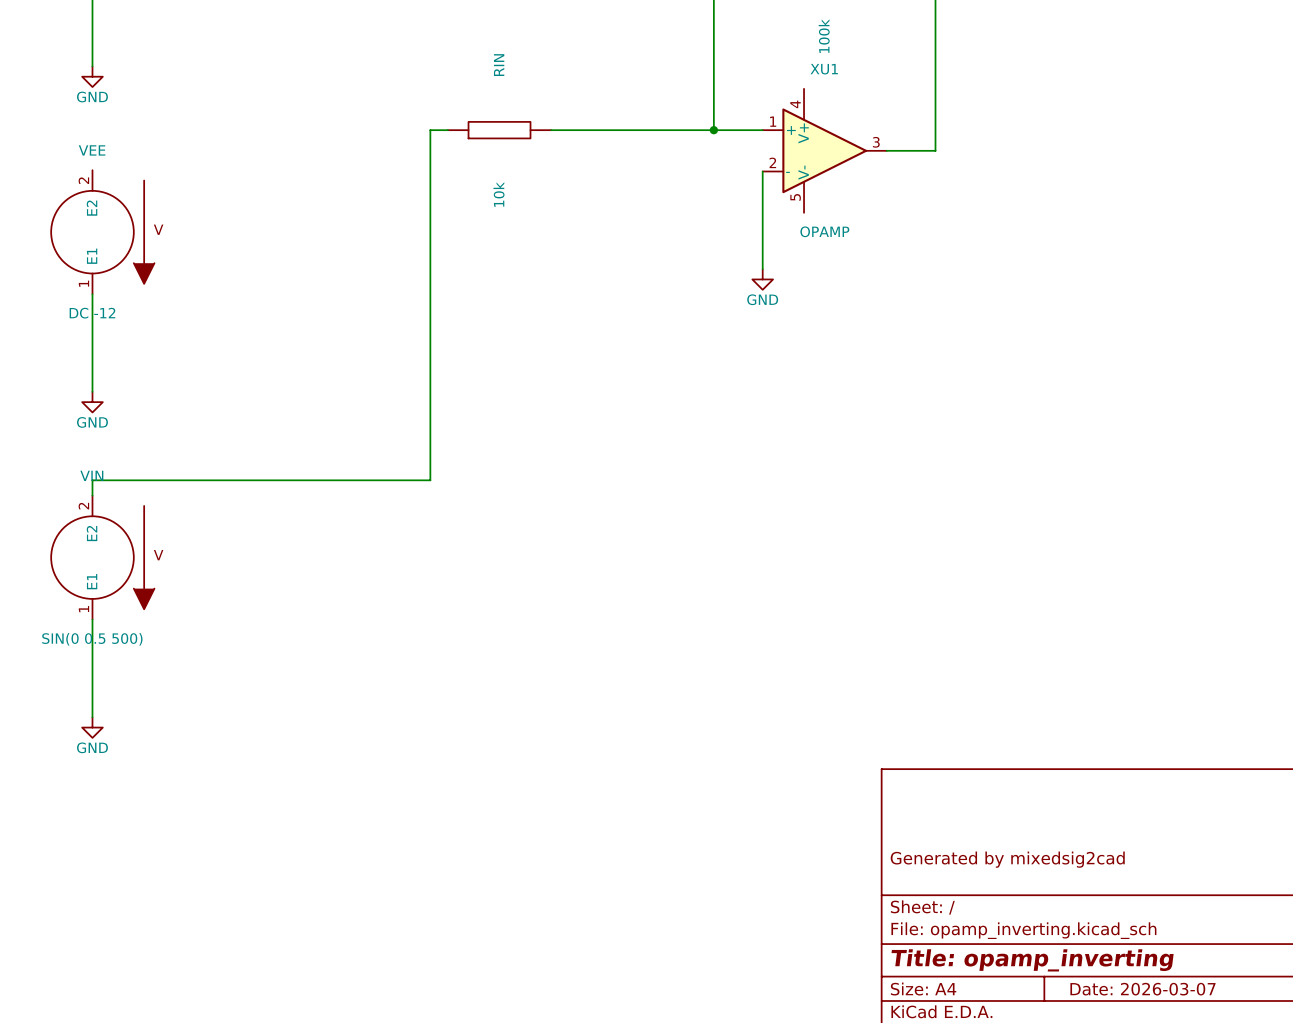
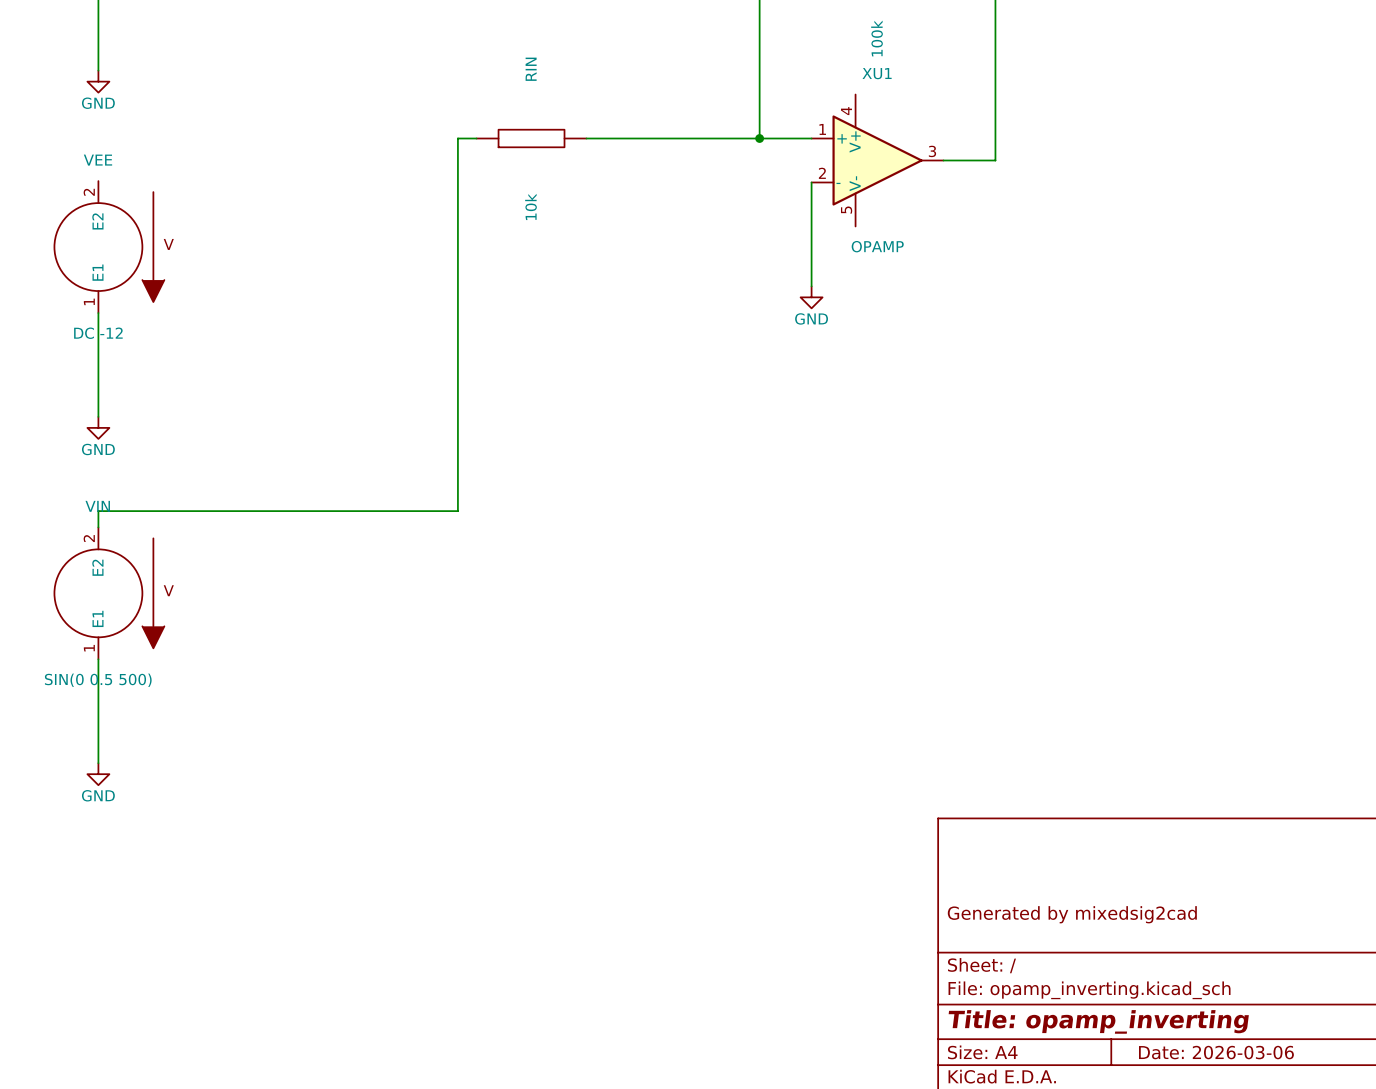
title block: Date: 2026-03-07 (1142, 989) -> Date: 2026-03-06 (1216, 1052)

